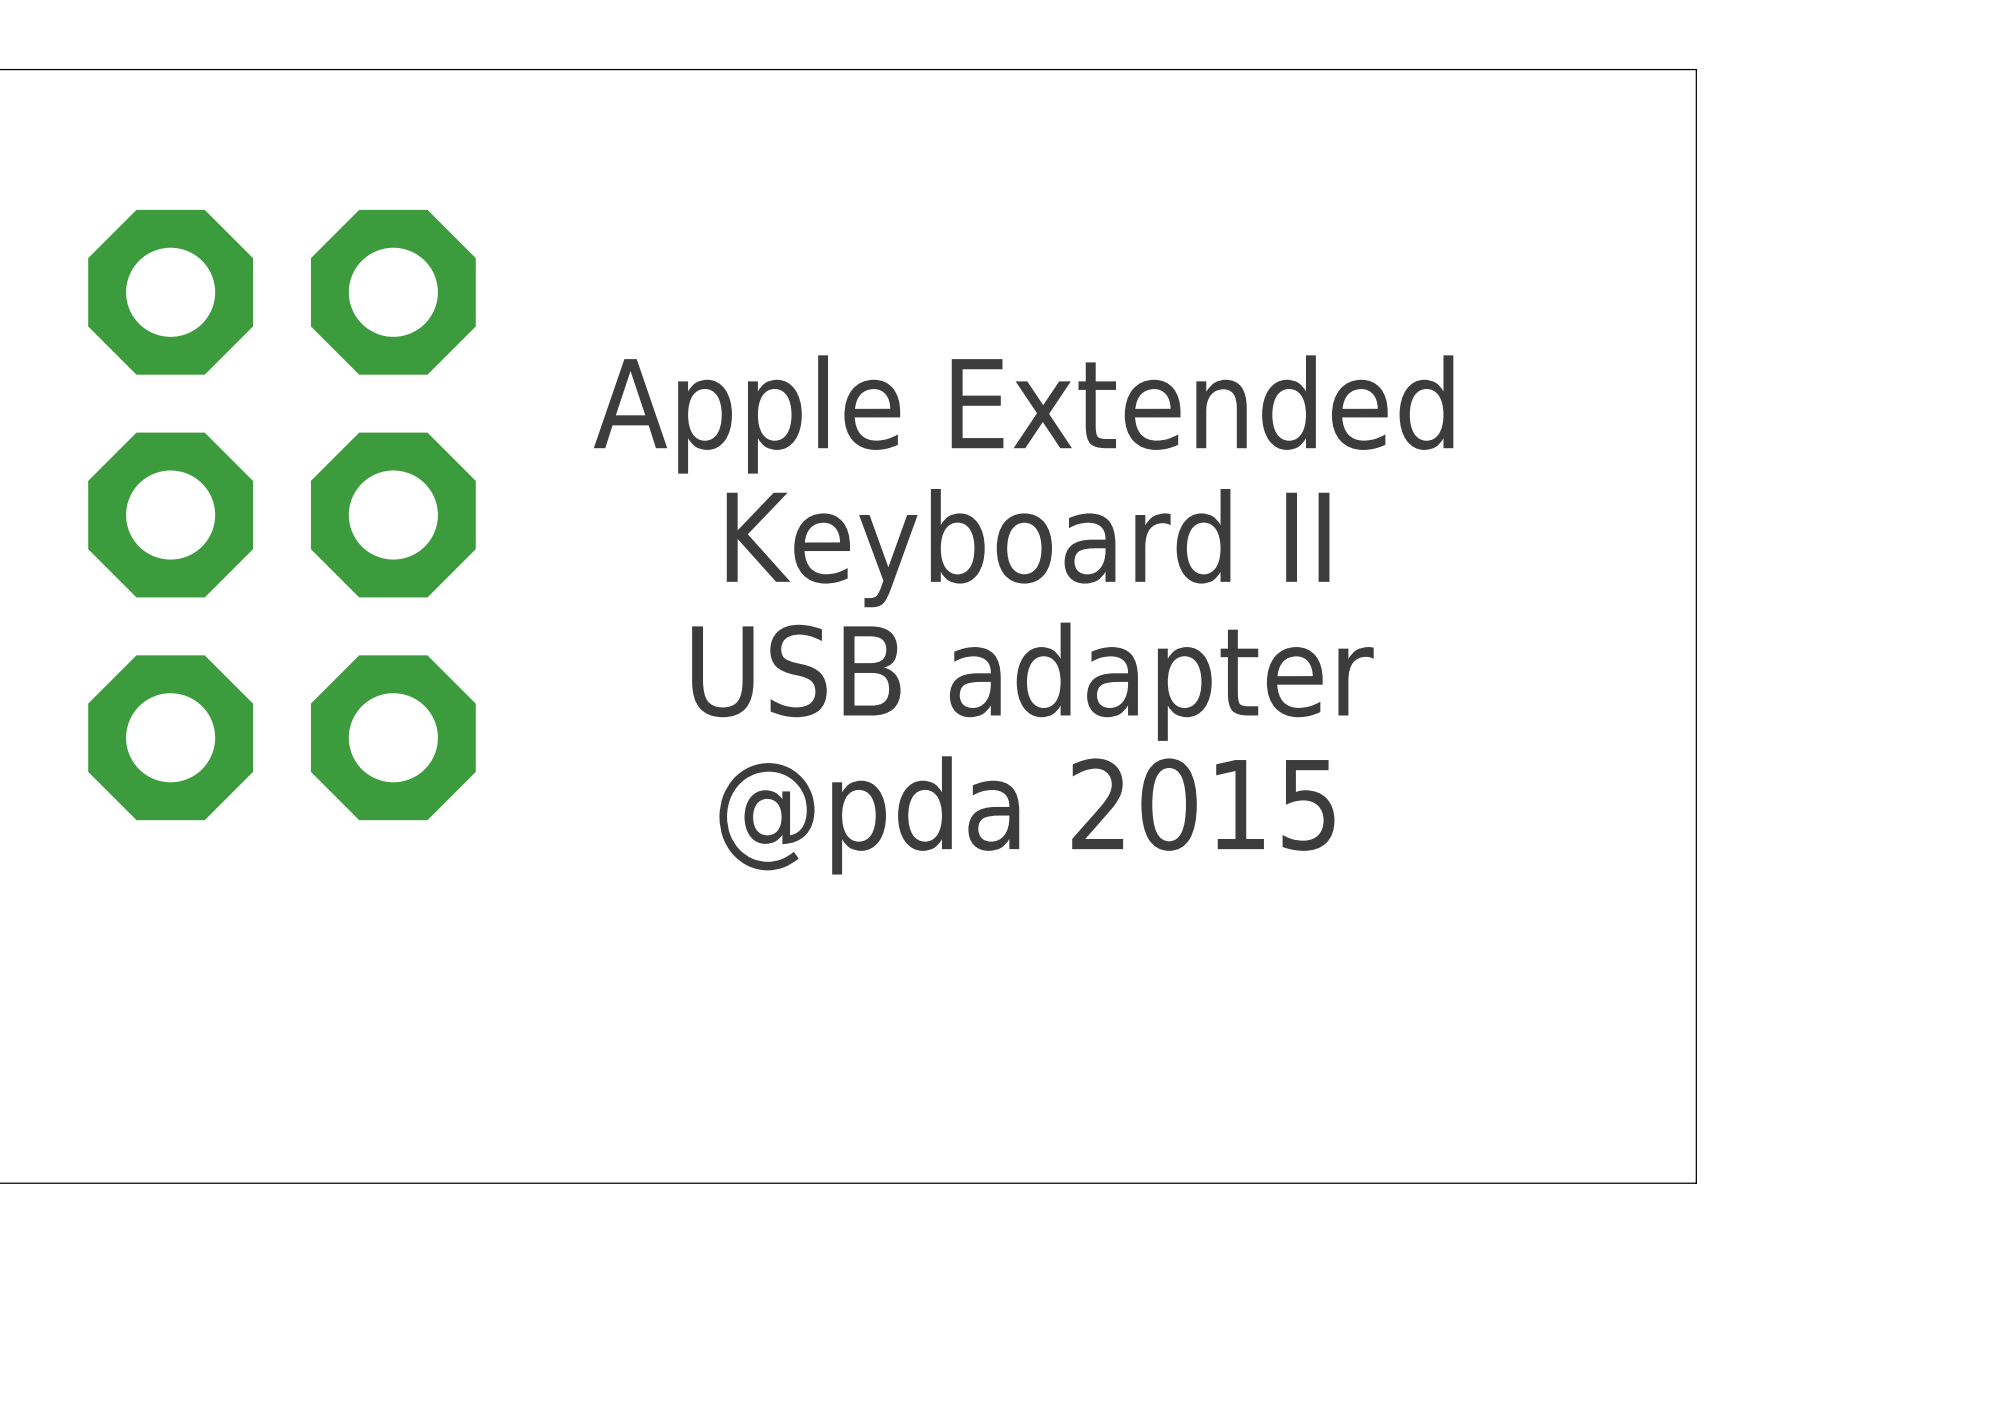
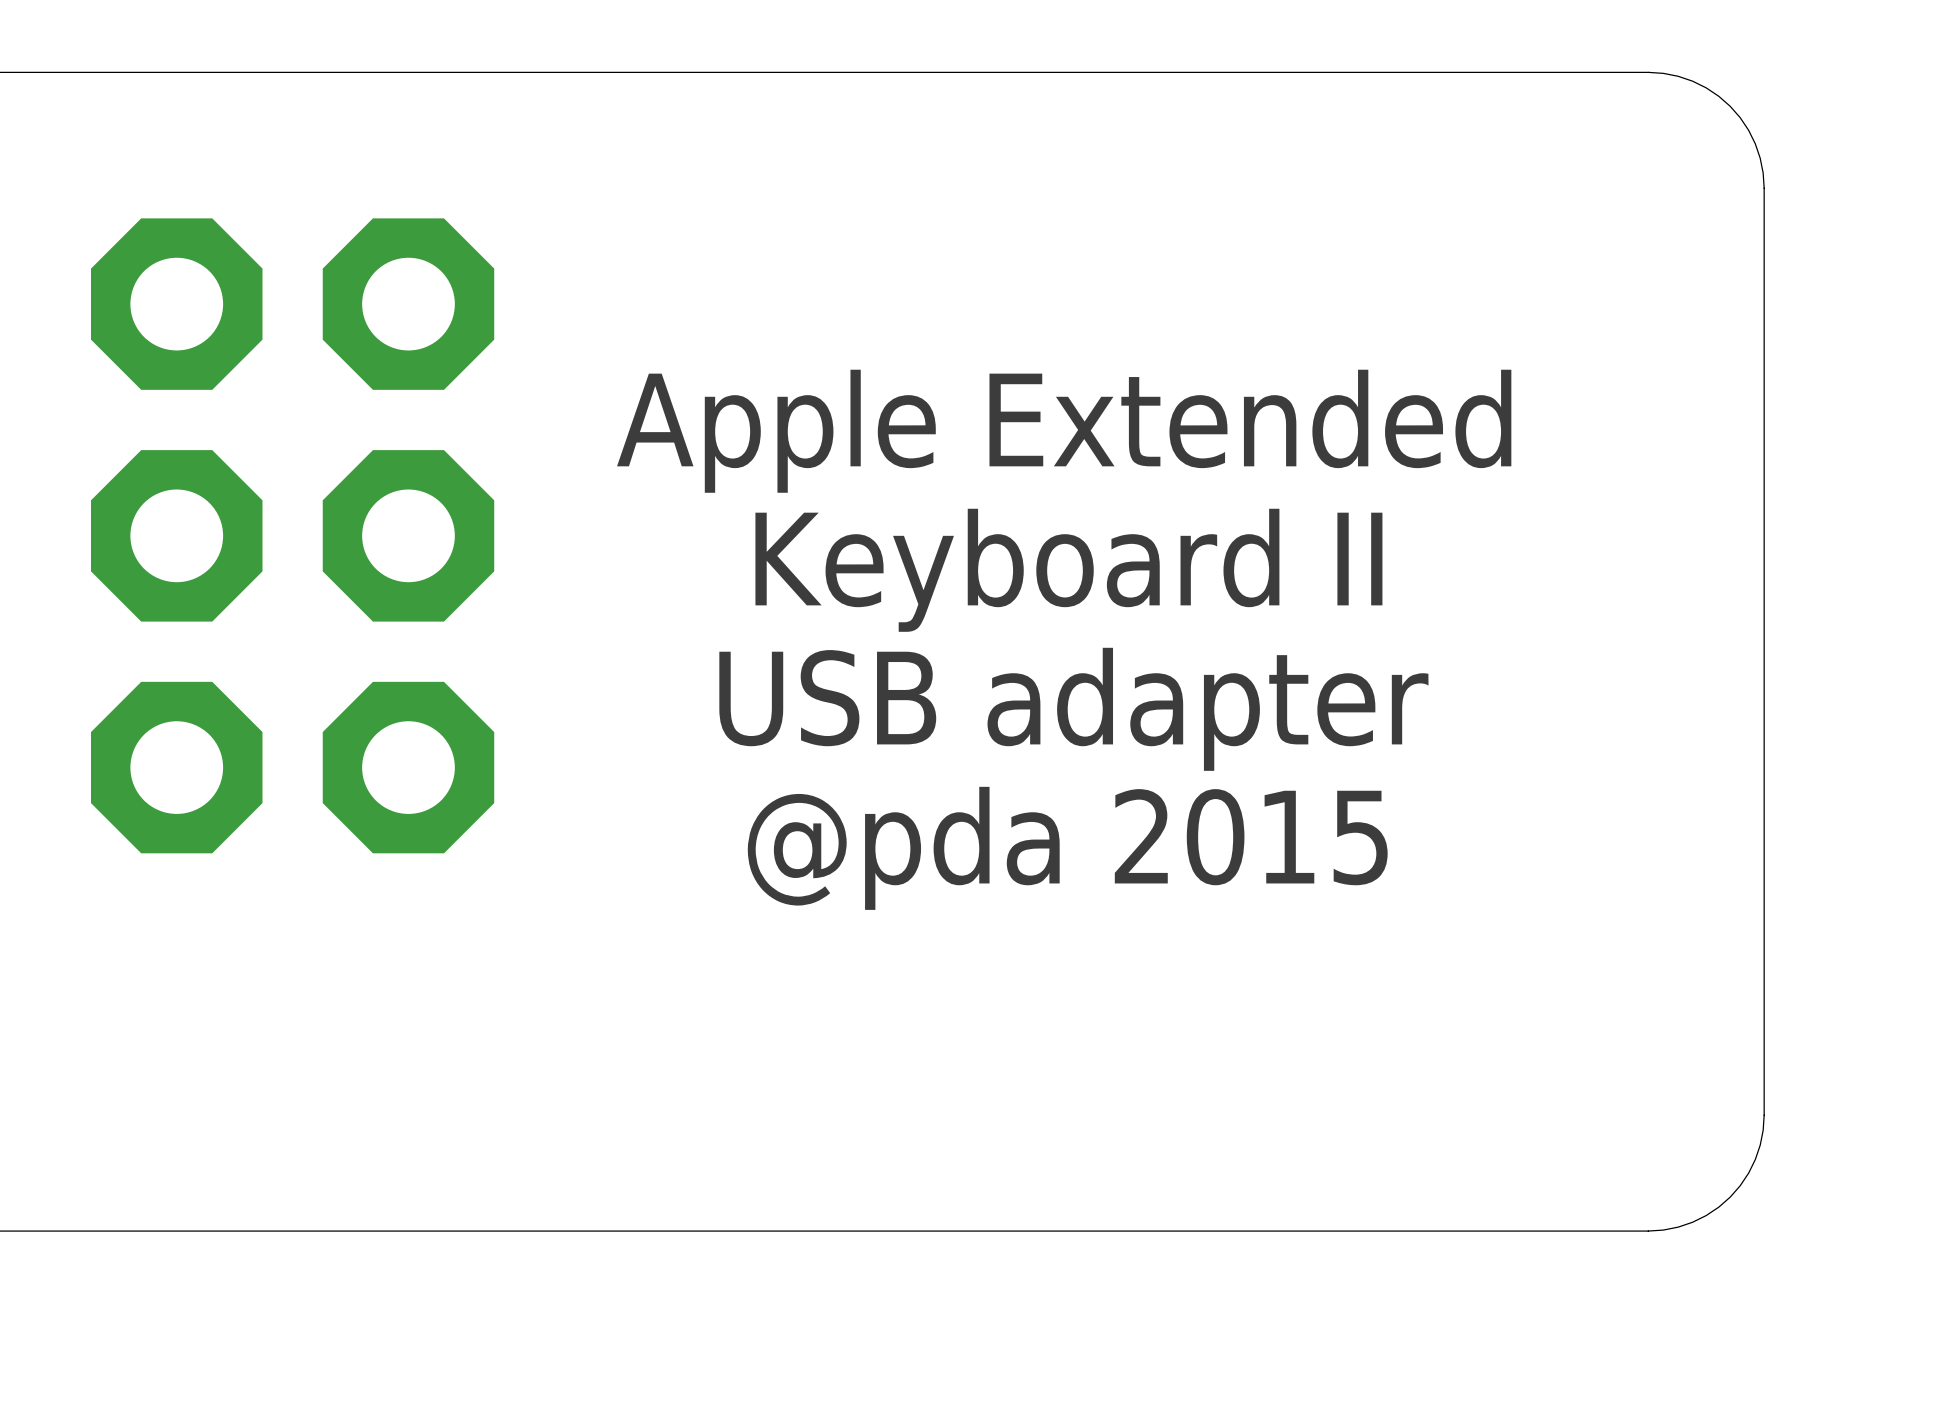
board edge: (1584, 69) (1696, 69) (1696, 180) -> (1648, 72) (1678, 76) (1692, 81) (1706, 87) (1730, 106) (1748, 130) (1755, 143) (1760, 158) (1764, 188)
board edge: (1696, 1071) (1696, 1183) (1584, 1183) -> (1764, 1115) (1760, 1145) (1755, 1159) (1748, 1173) (1730, 1197) (1706, 1215) (1692, 1222) (1678, 1227) (1648, 1231)

